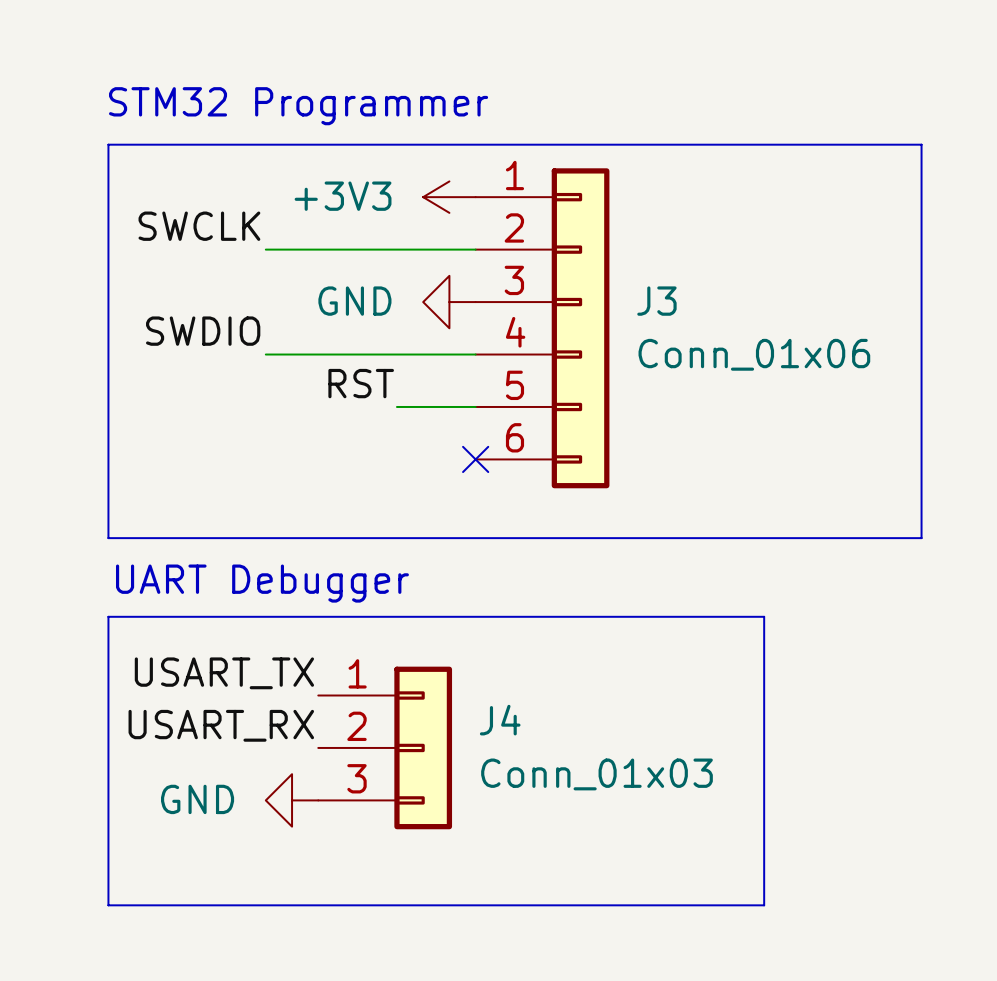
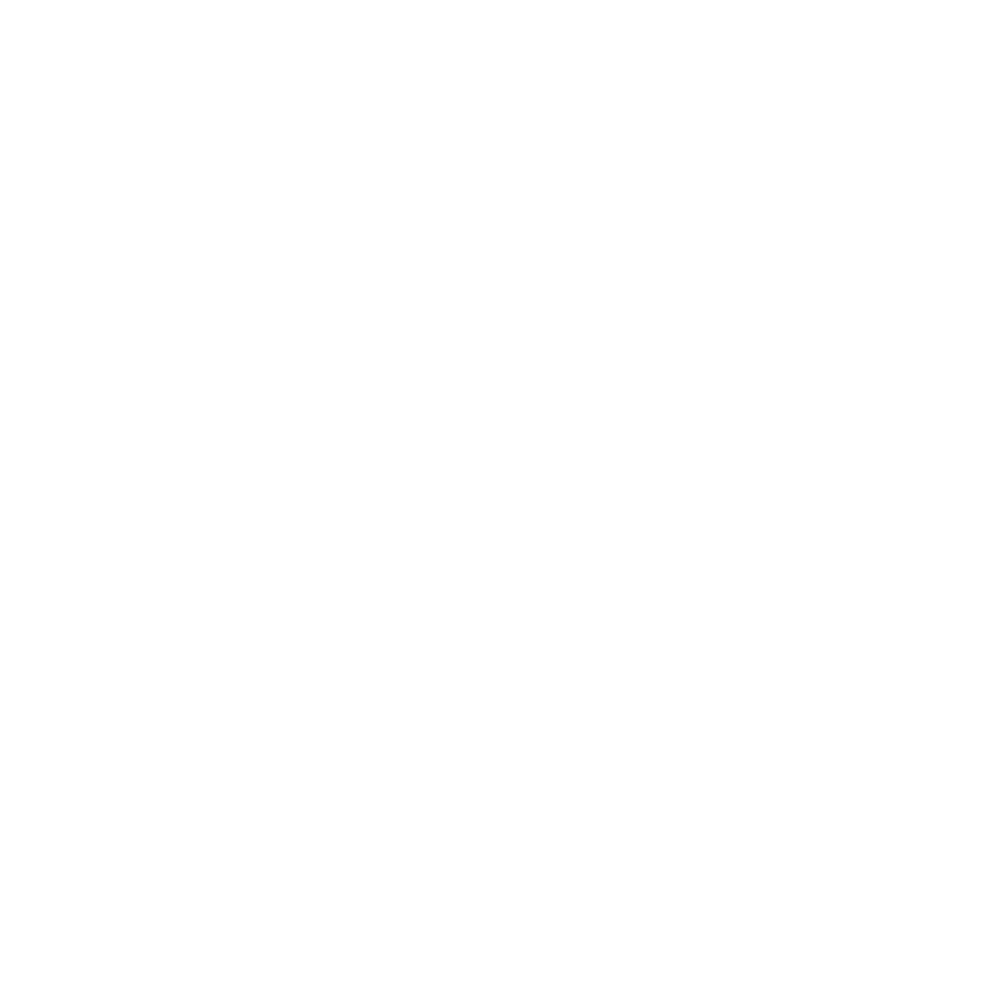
text: STM32 Programmer (298, 106) -> none
line: (108, 144) (108, 538) (921, 538) (921, 144) (108, 144) -> none
power symbol: +3V3 (449, 197) -> none
label: SWCLK (199, 226) -> none
wire: (265, 249) (475, 249) -> none
power symbol: GND (449, 302) -> none
J3: Conn_01x06 (542, 328) -> none
label: SWDIO (203, 331) -> none
wire: (265, 354) (475, 354) -> none
label: RST (361, 383) -> none
wire: (396, 406) (475, 406) -> none
no-connect mark: (475, 459) -> none
text: UART Debugger (262, 583) -> none
line: (108, 616) (764, 616) (764, 905) (108, 905) (108, 616) -> none
label: USART_TX (224, 673) -> none
label: USART_RX (221, 725) -> none
J4: Conn_01x03 (385, 747) -> none
power symbol: GND (292, 800) -> none

